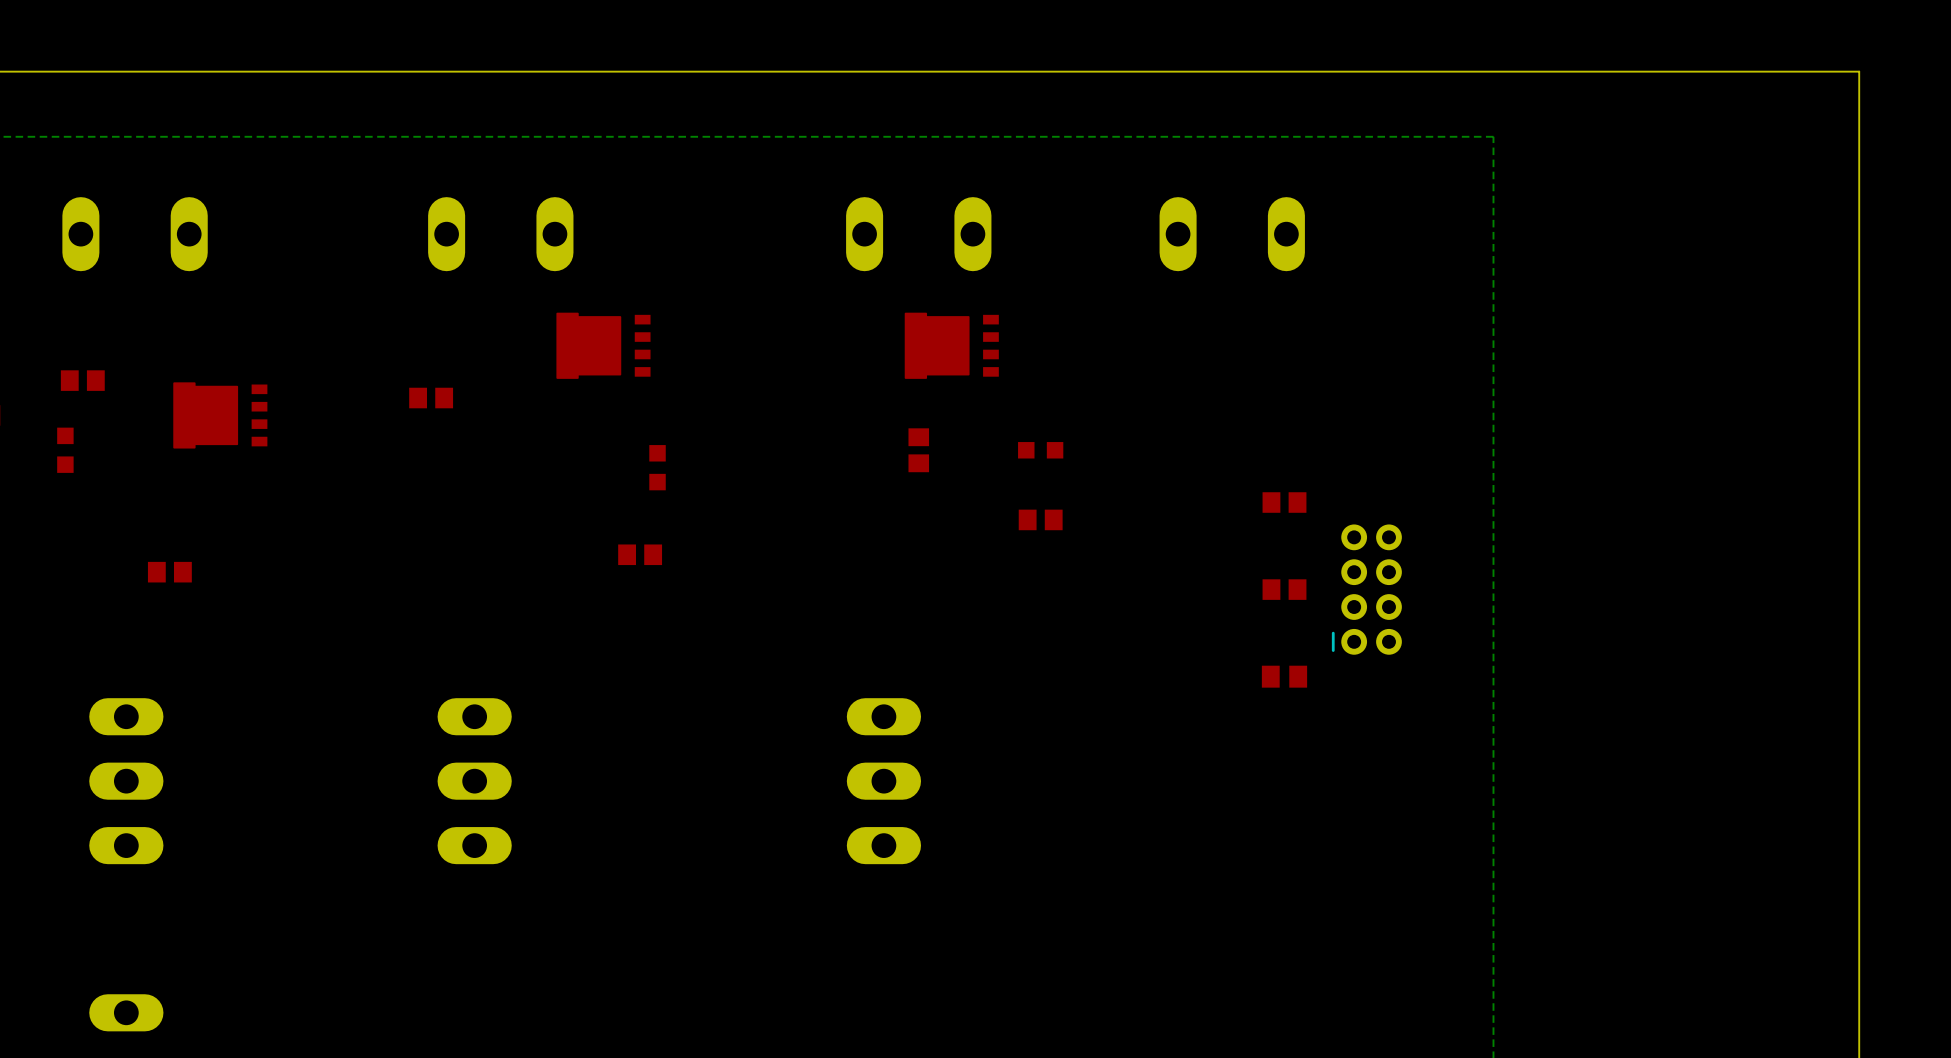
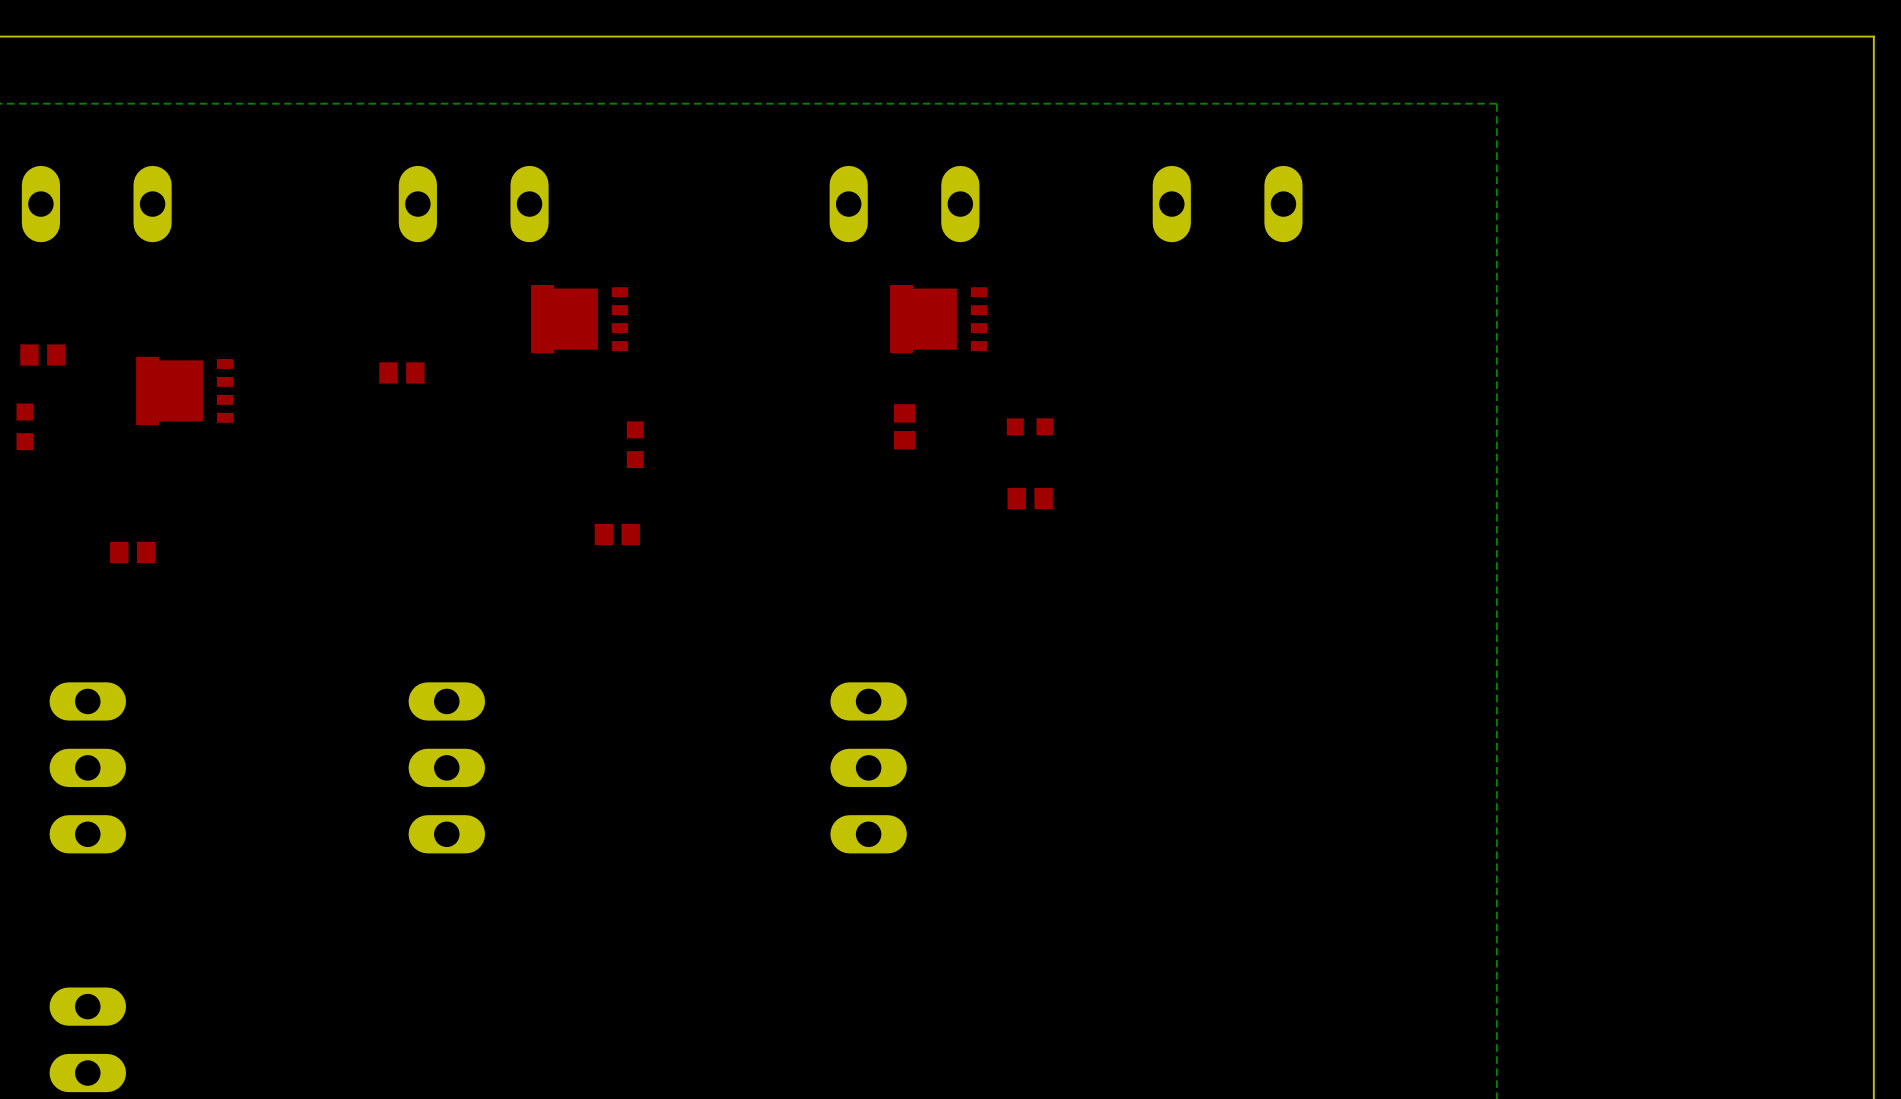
part: (1284, 502) -> none
part: (1284, 589) -> none
part: (1366, 589) -> none
part: (1284, 676) -> none

